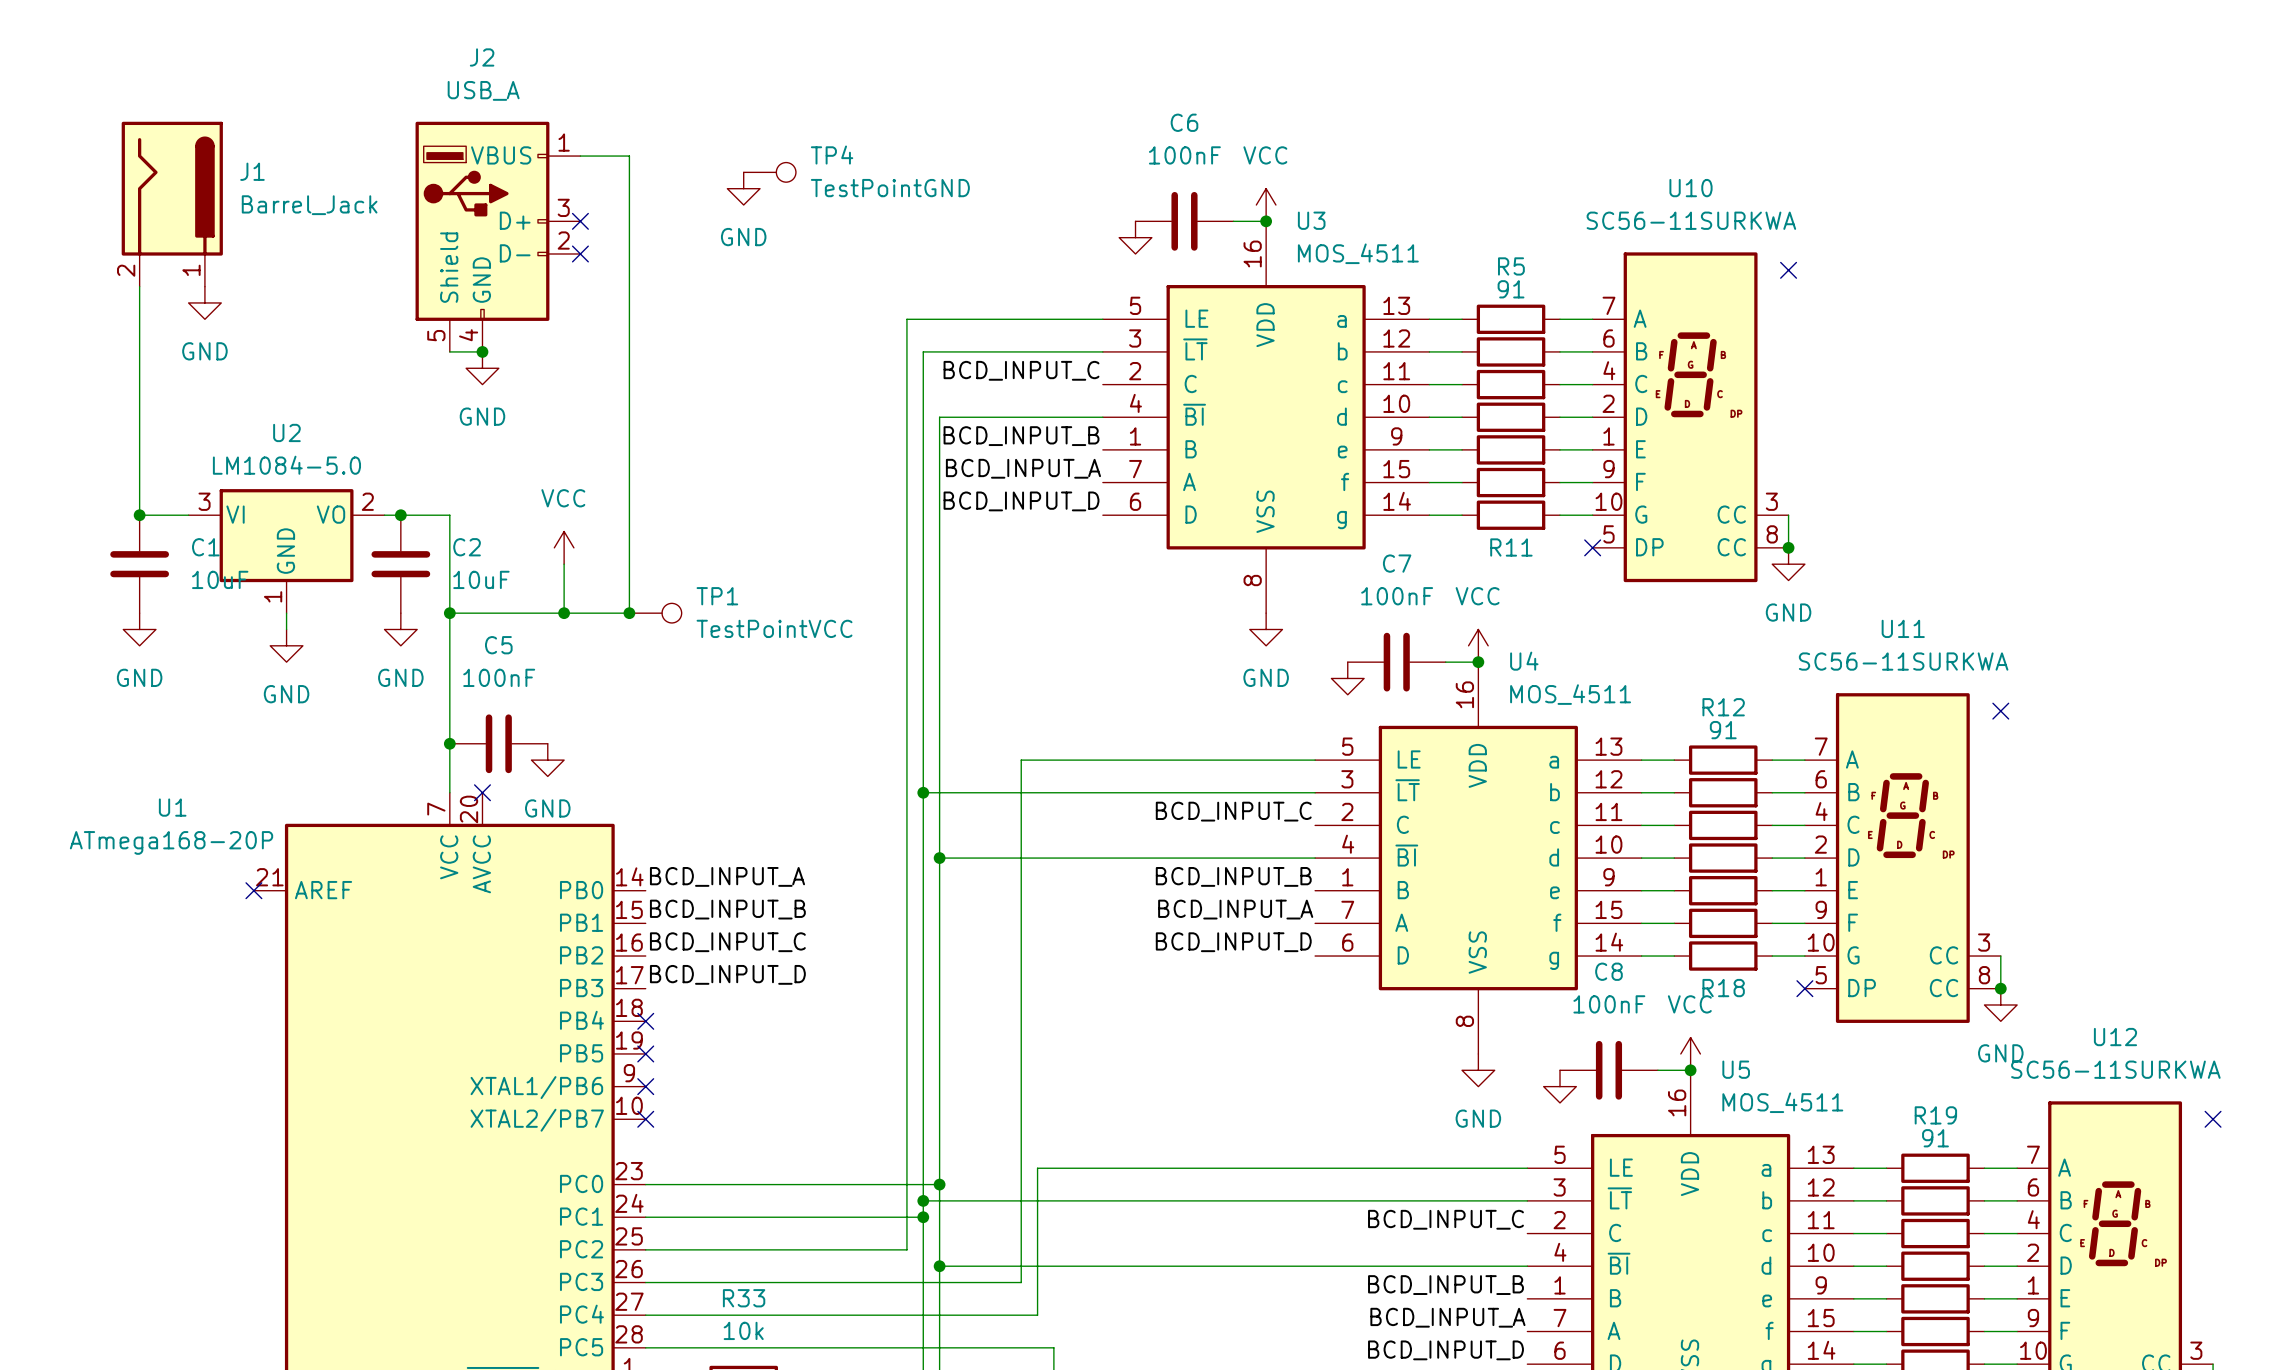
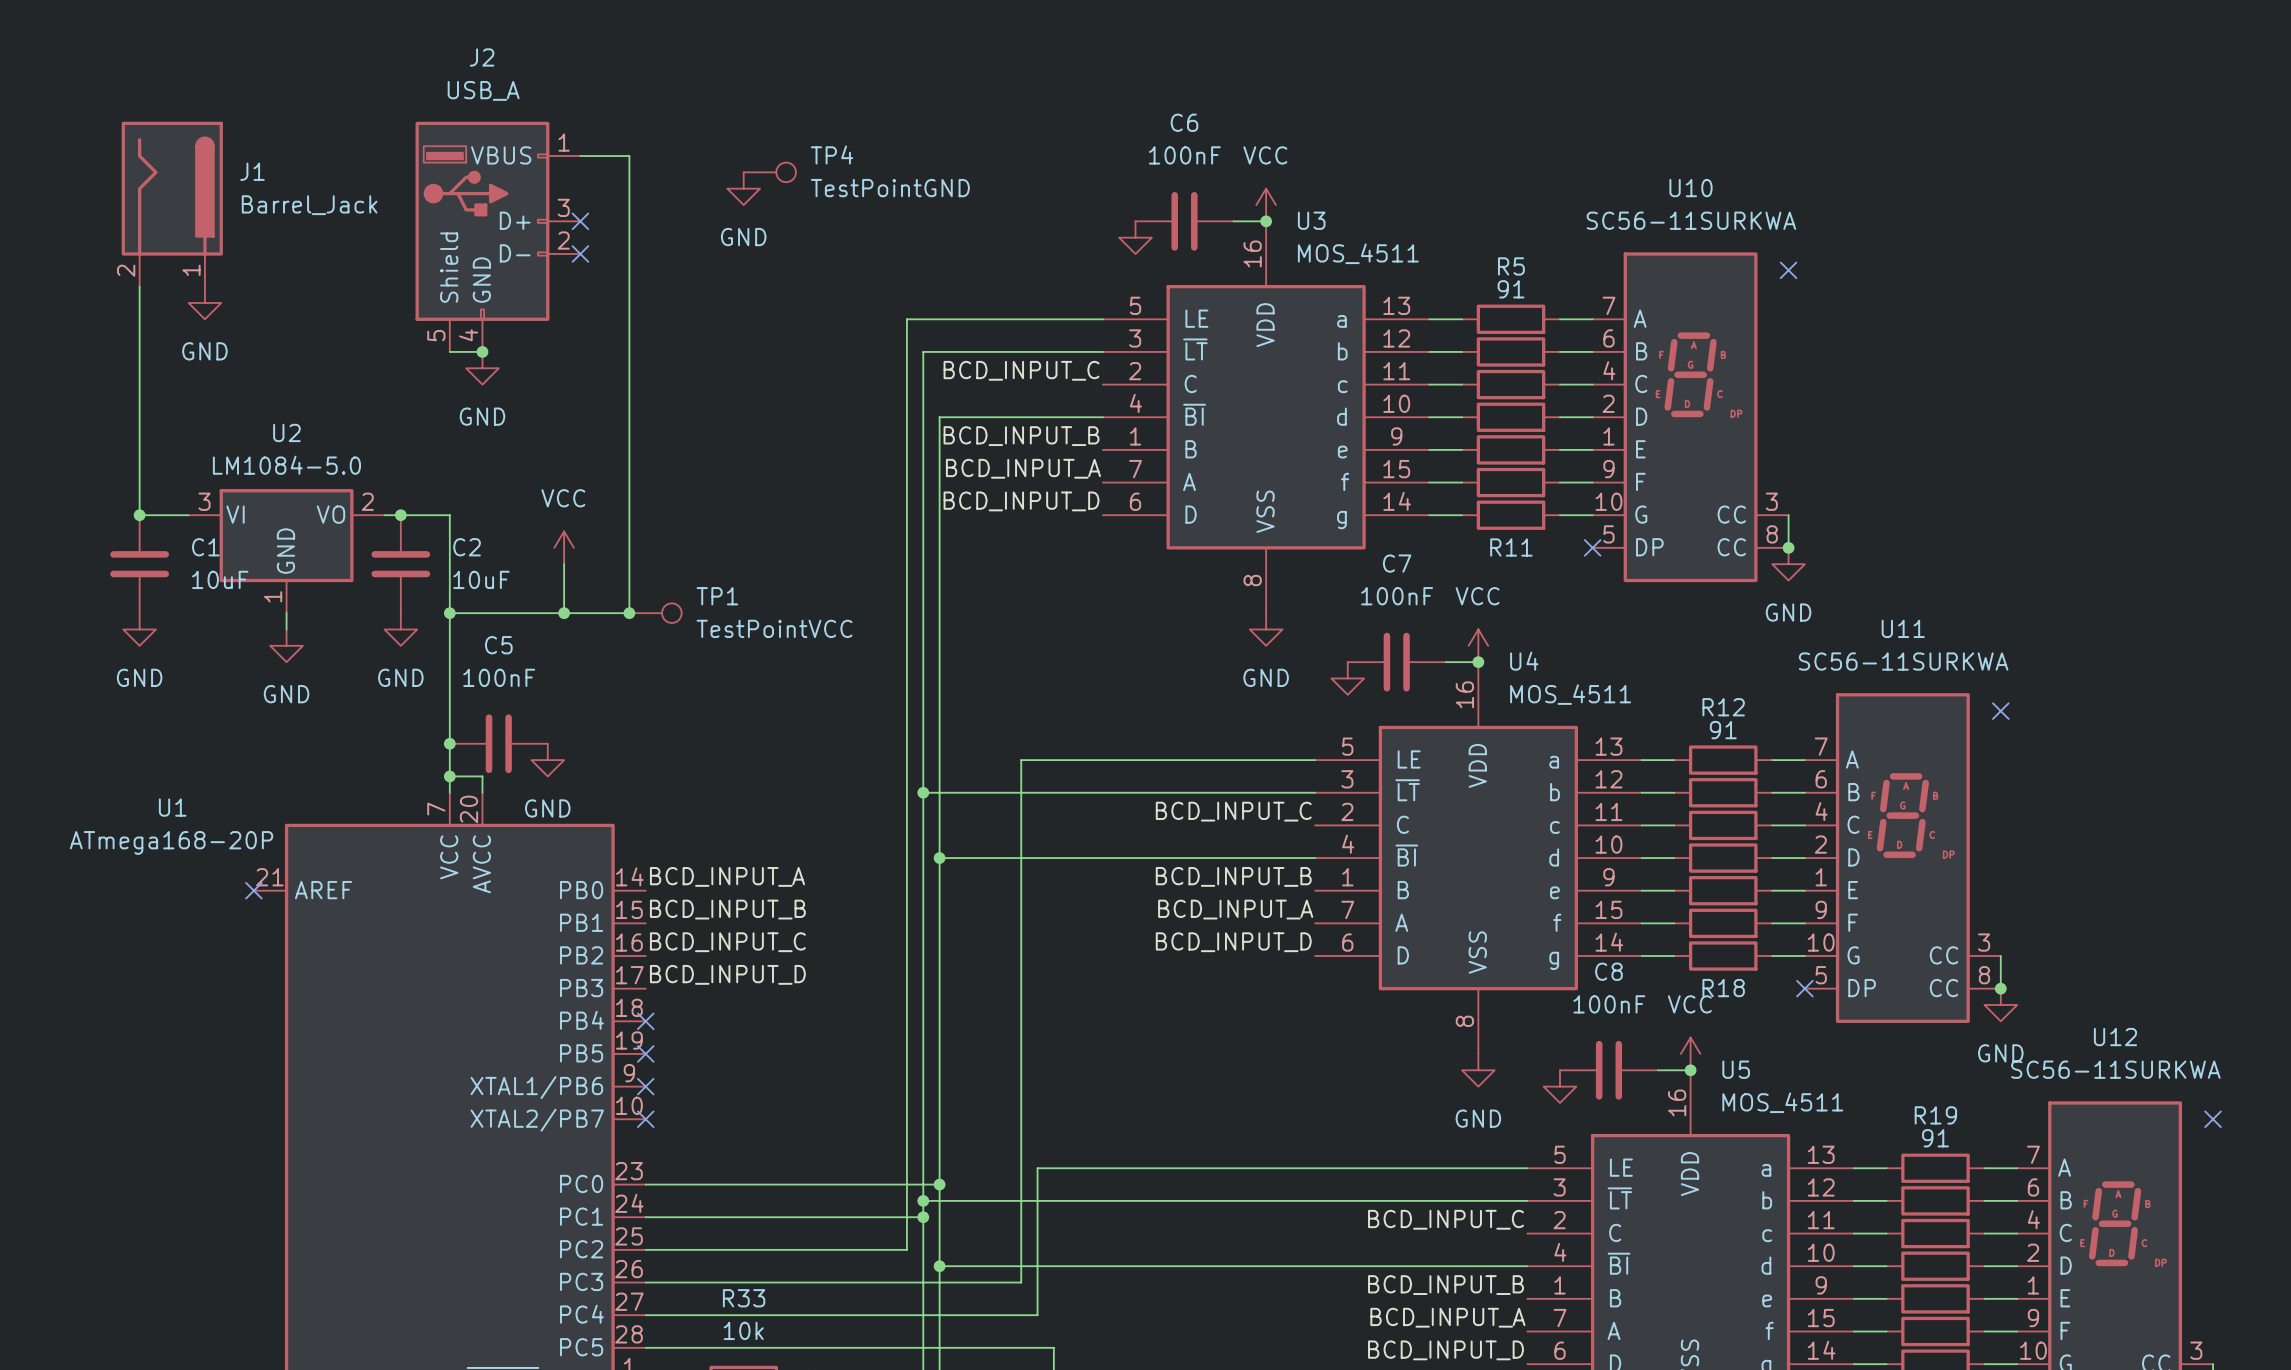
wire: none -> (449, 776) (482, 776) (482, 792)
junction: none -> (449, 776)
no-connect mark: (482, 792) -> none

